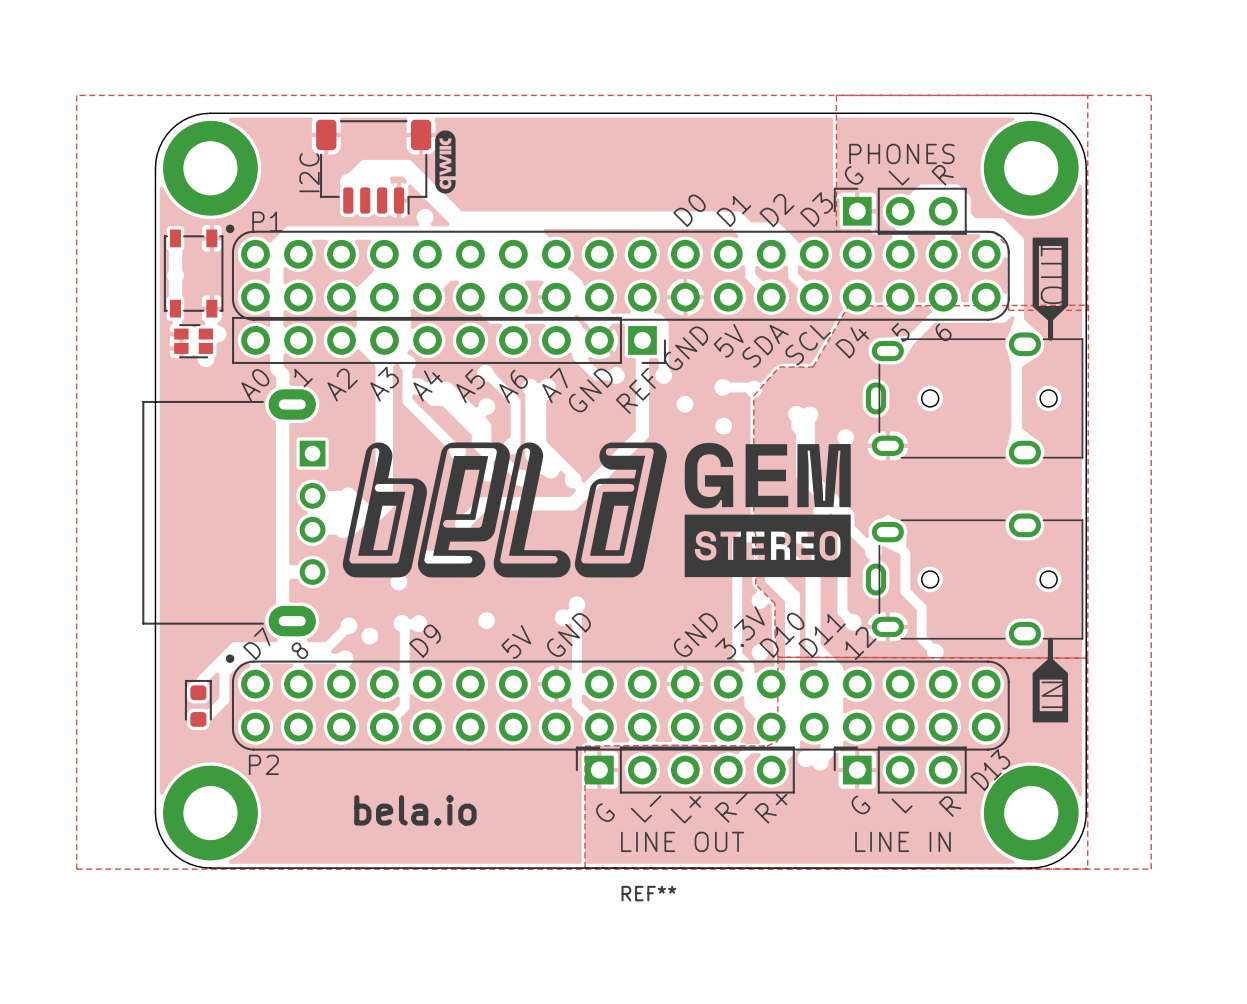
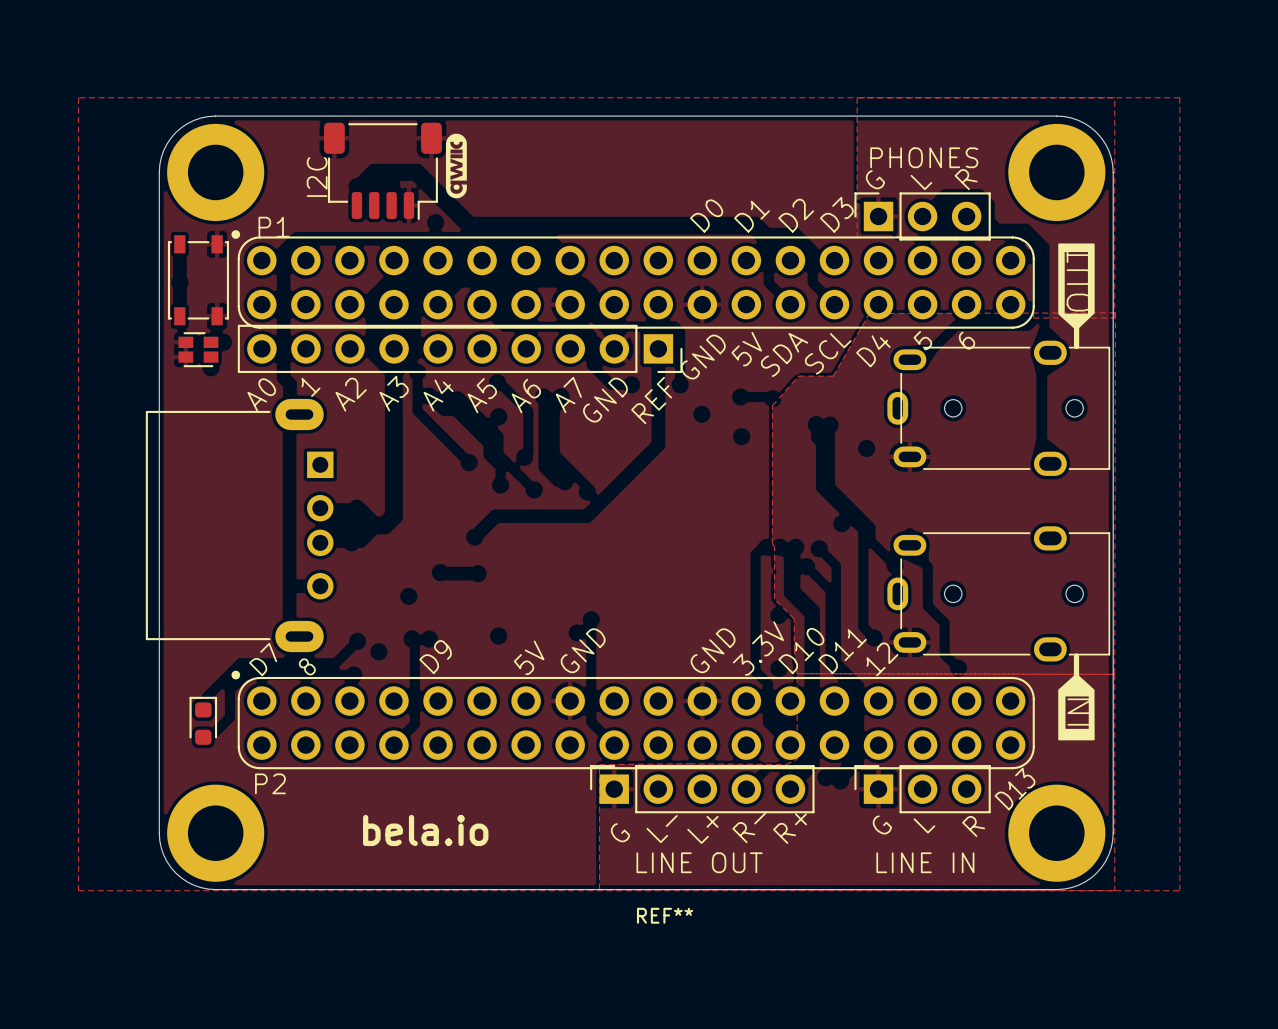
drawing: [342, 442, 851, 578] -> none

